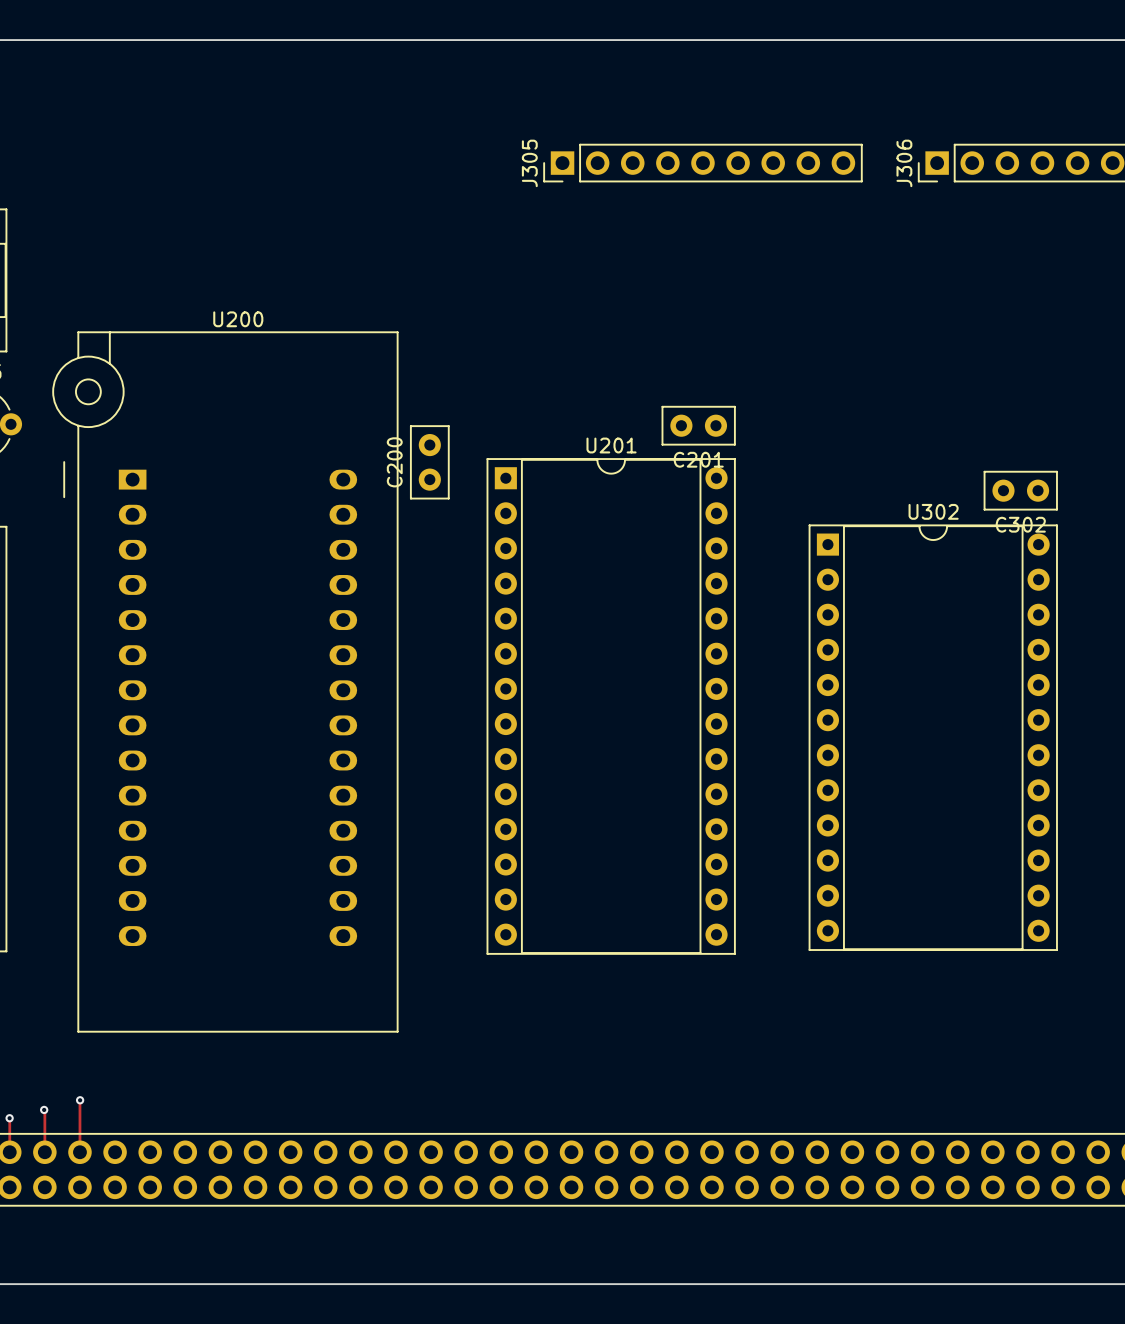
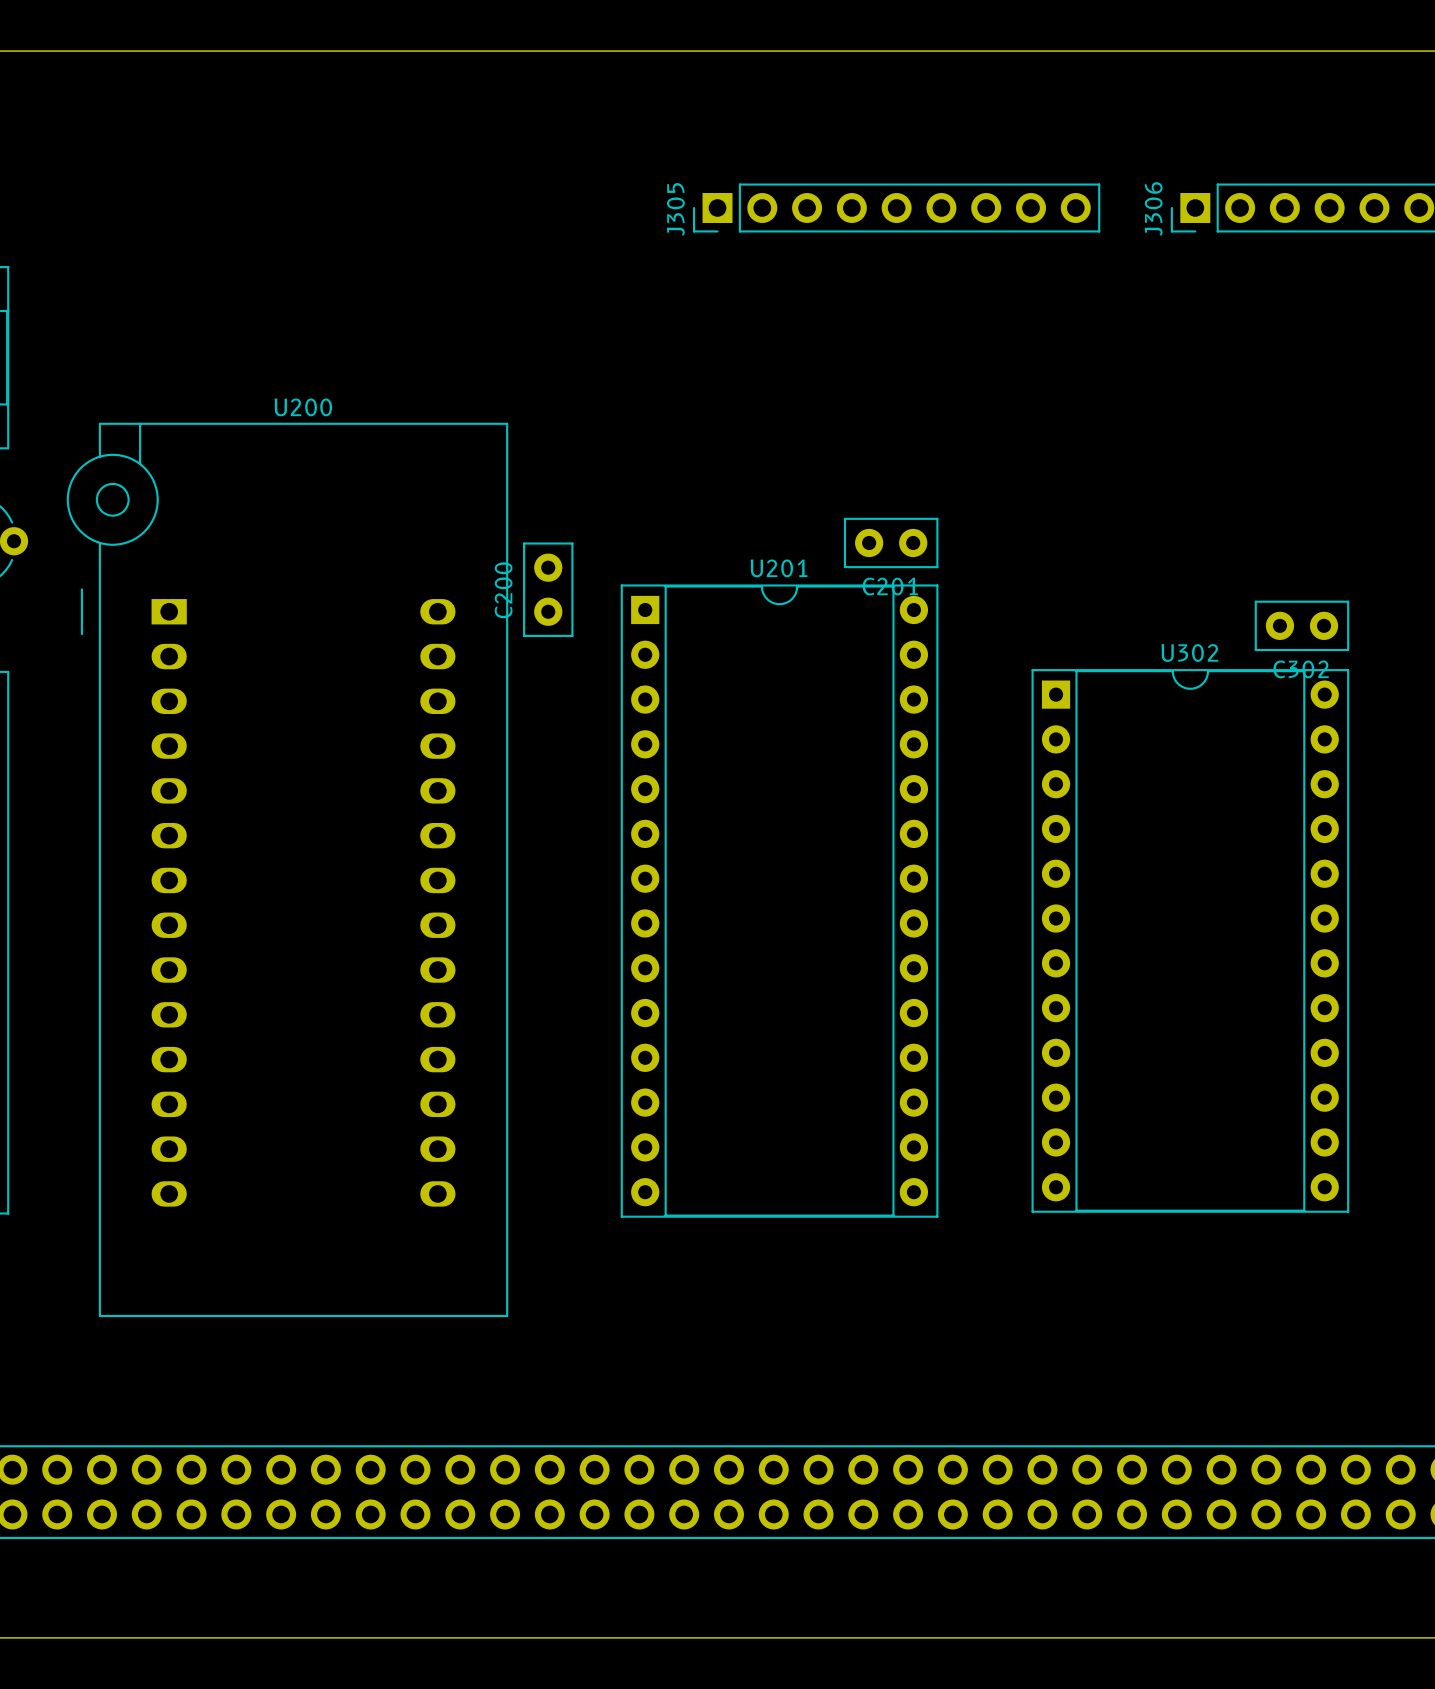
track: (79, 1100) (79, 1152) -> none
via: (80, 1100) -> none
track: (44, 1109) (44, 1152) -> none
via: (44, 1109) -> none
track: (9, 1118) (9, 1152) -> none
via: (9, 1118) -> none

